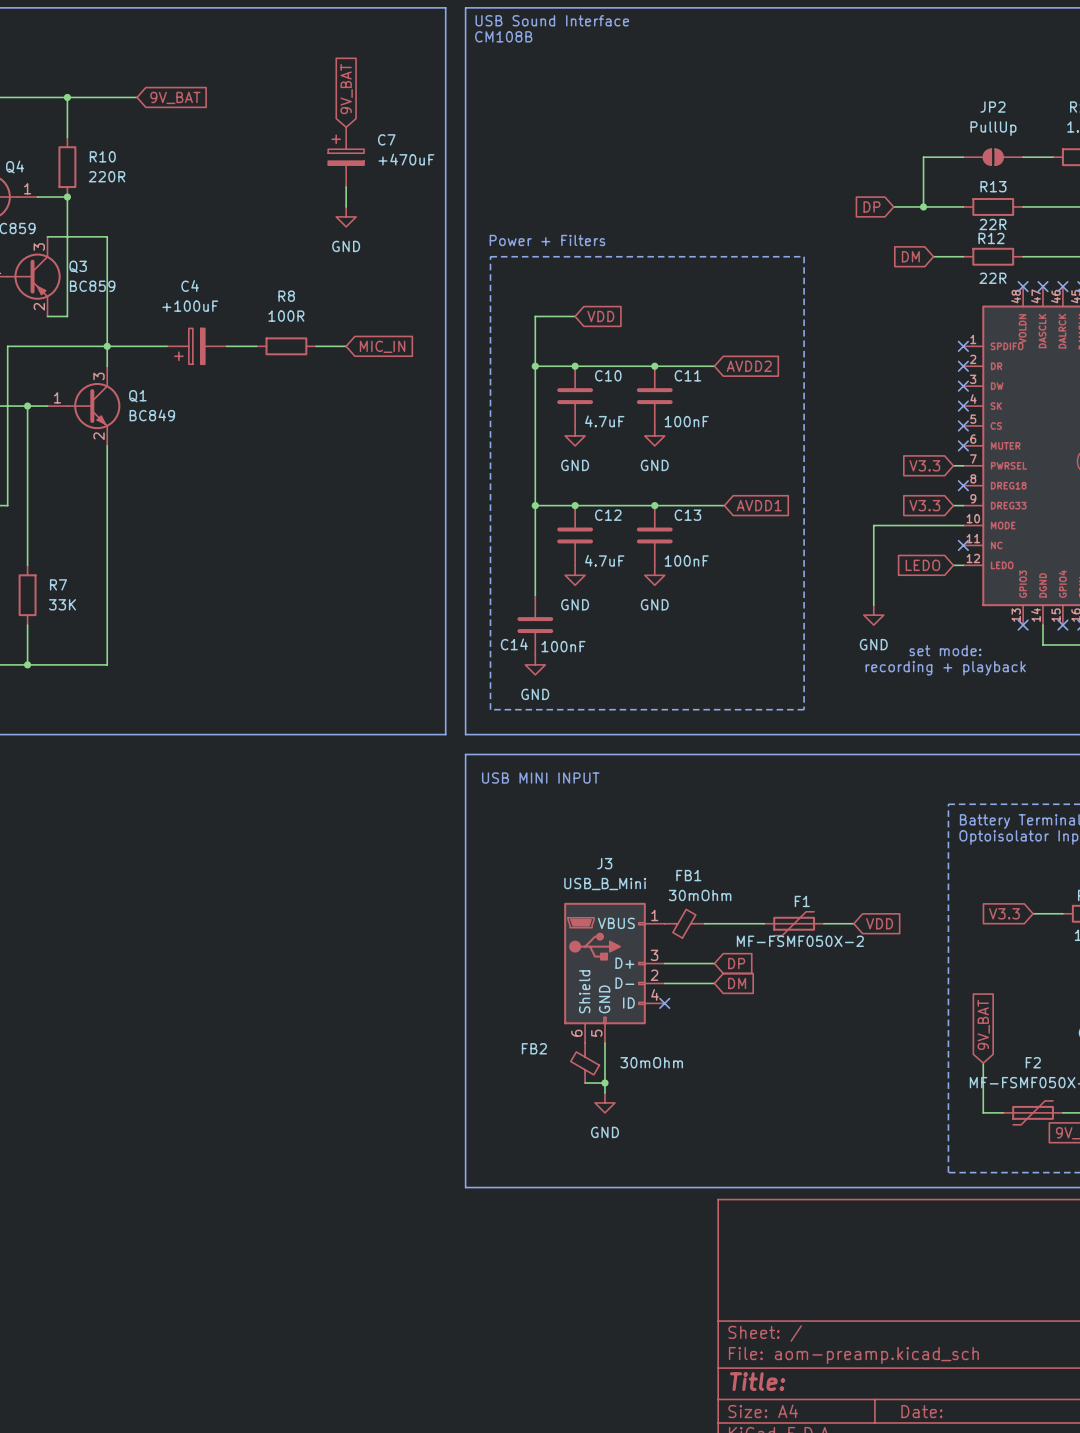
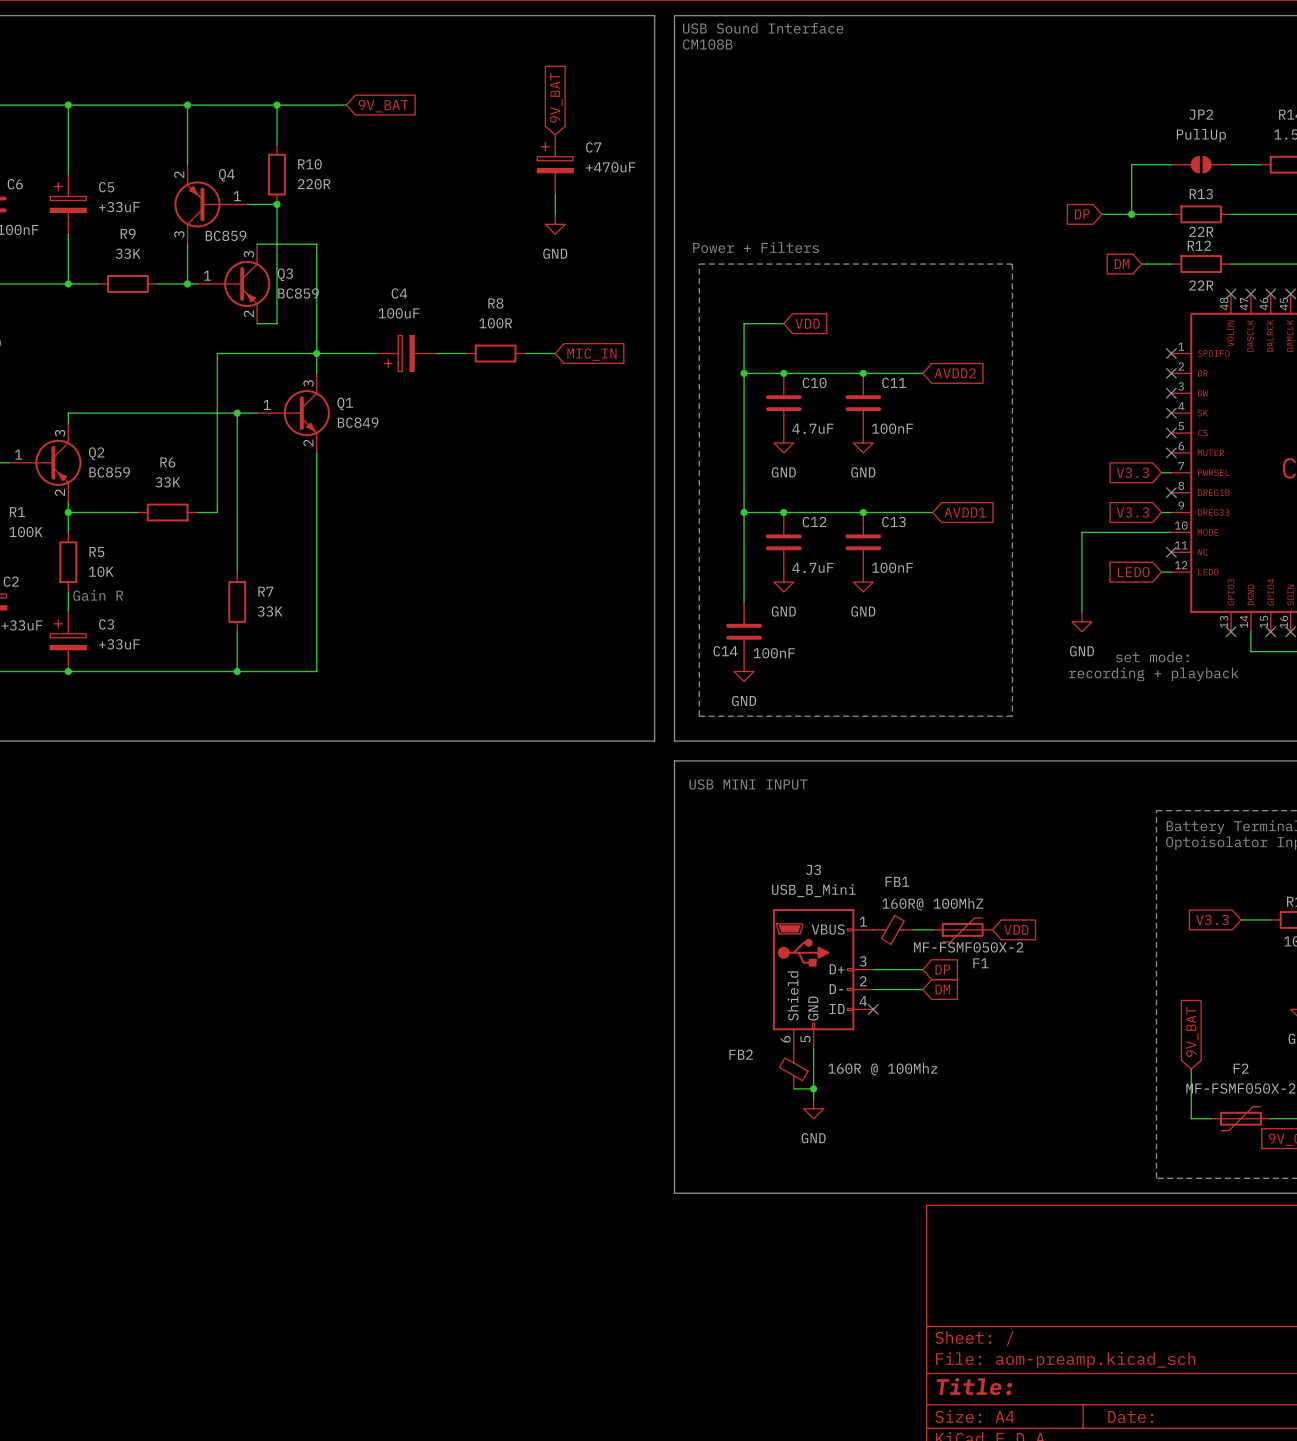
C4 value: +100uF (190, 306) -> 100uF (399, 313)
FB1 value: 30mOhm (700, 895) -> 160R@ 100MhZ (932, 904)
F1 name position: F1 (802, 901) -> F1 (980, 963)
F1 position: (794, 923) -> (962, 929)
wire: (824, 923) (853, 923) -> none
global label position: VDD (879, 923) -> VDD (1016, 929)
FB2 value: 30mOhm (651, 1062) -> 160R @ 100Mhz (882, 1069)

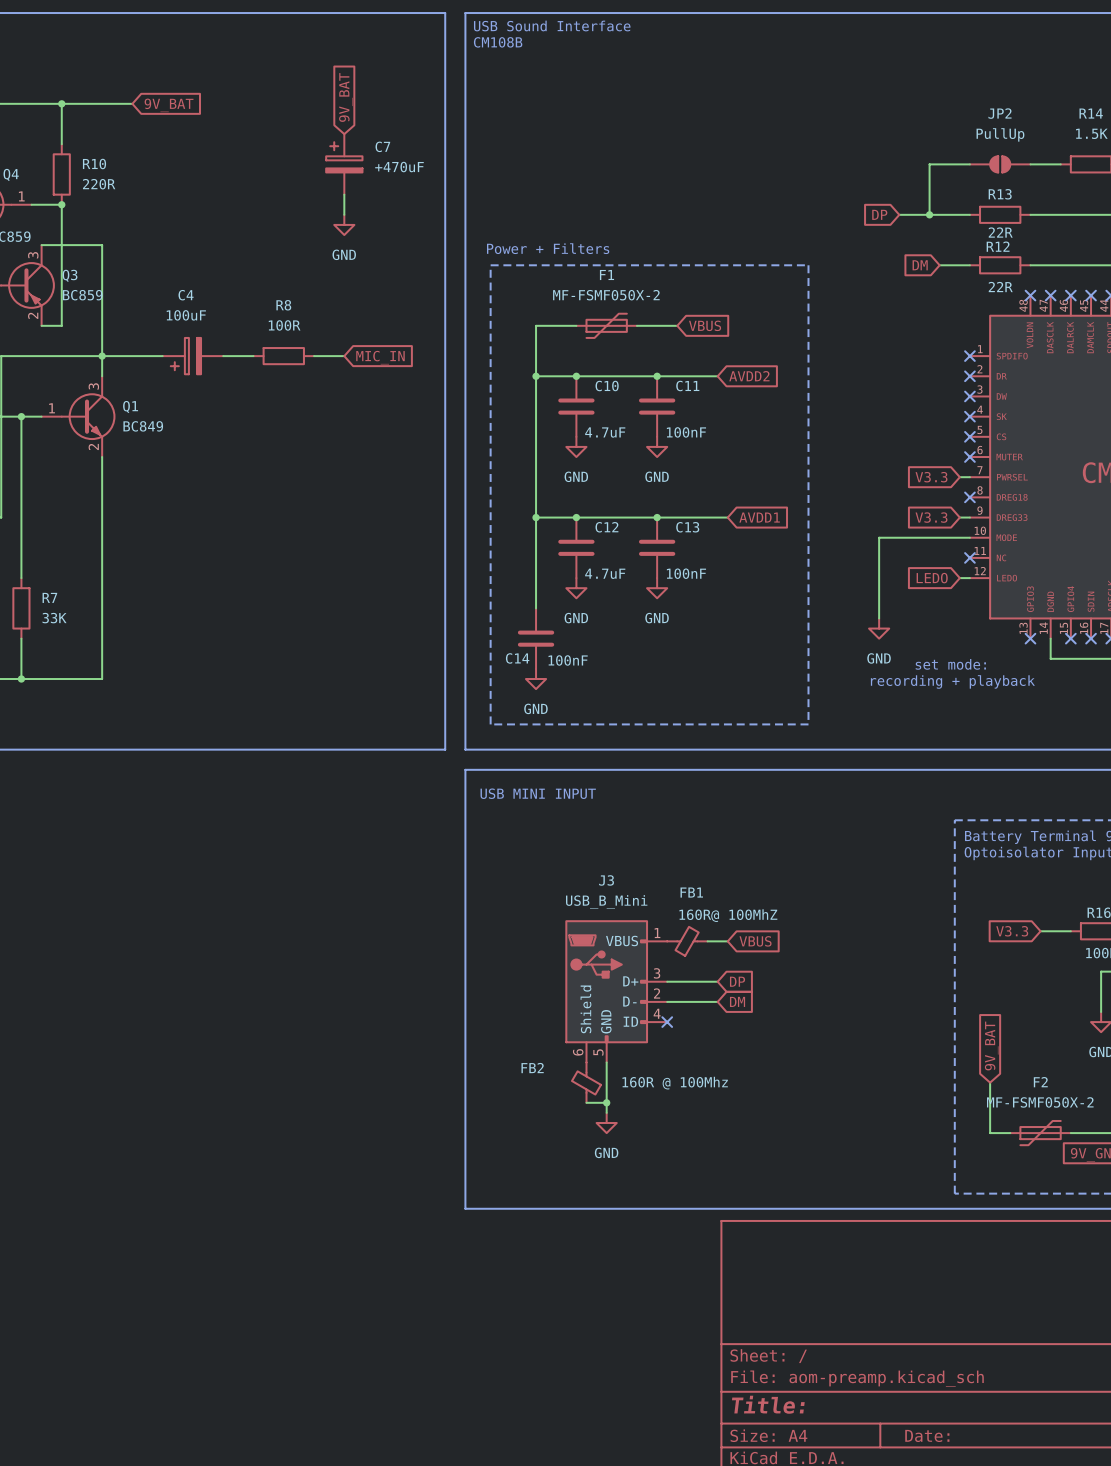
global label: VDD (807, 323) -> none
wire: none -> (636, 325) (677, 325)
global label: none -> VBUS (705, 325)
global label: none -> VBUS (755, 941)
F1 position: (962, 929) -> (606, 325)
global label: VDD (1016, 929) -> none
F1 value position: MF-FSMF050X-2 (968, 947) -> MF-FSMF050X-2 (606, 295)
F1 name position: F1 (980, 963) -> F1 (606, 275)

